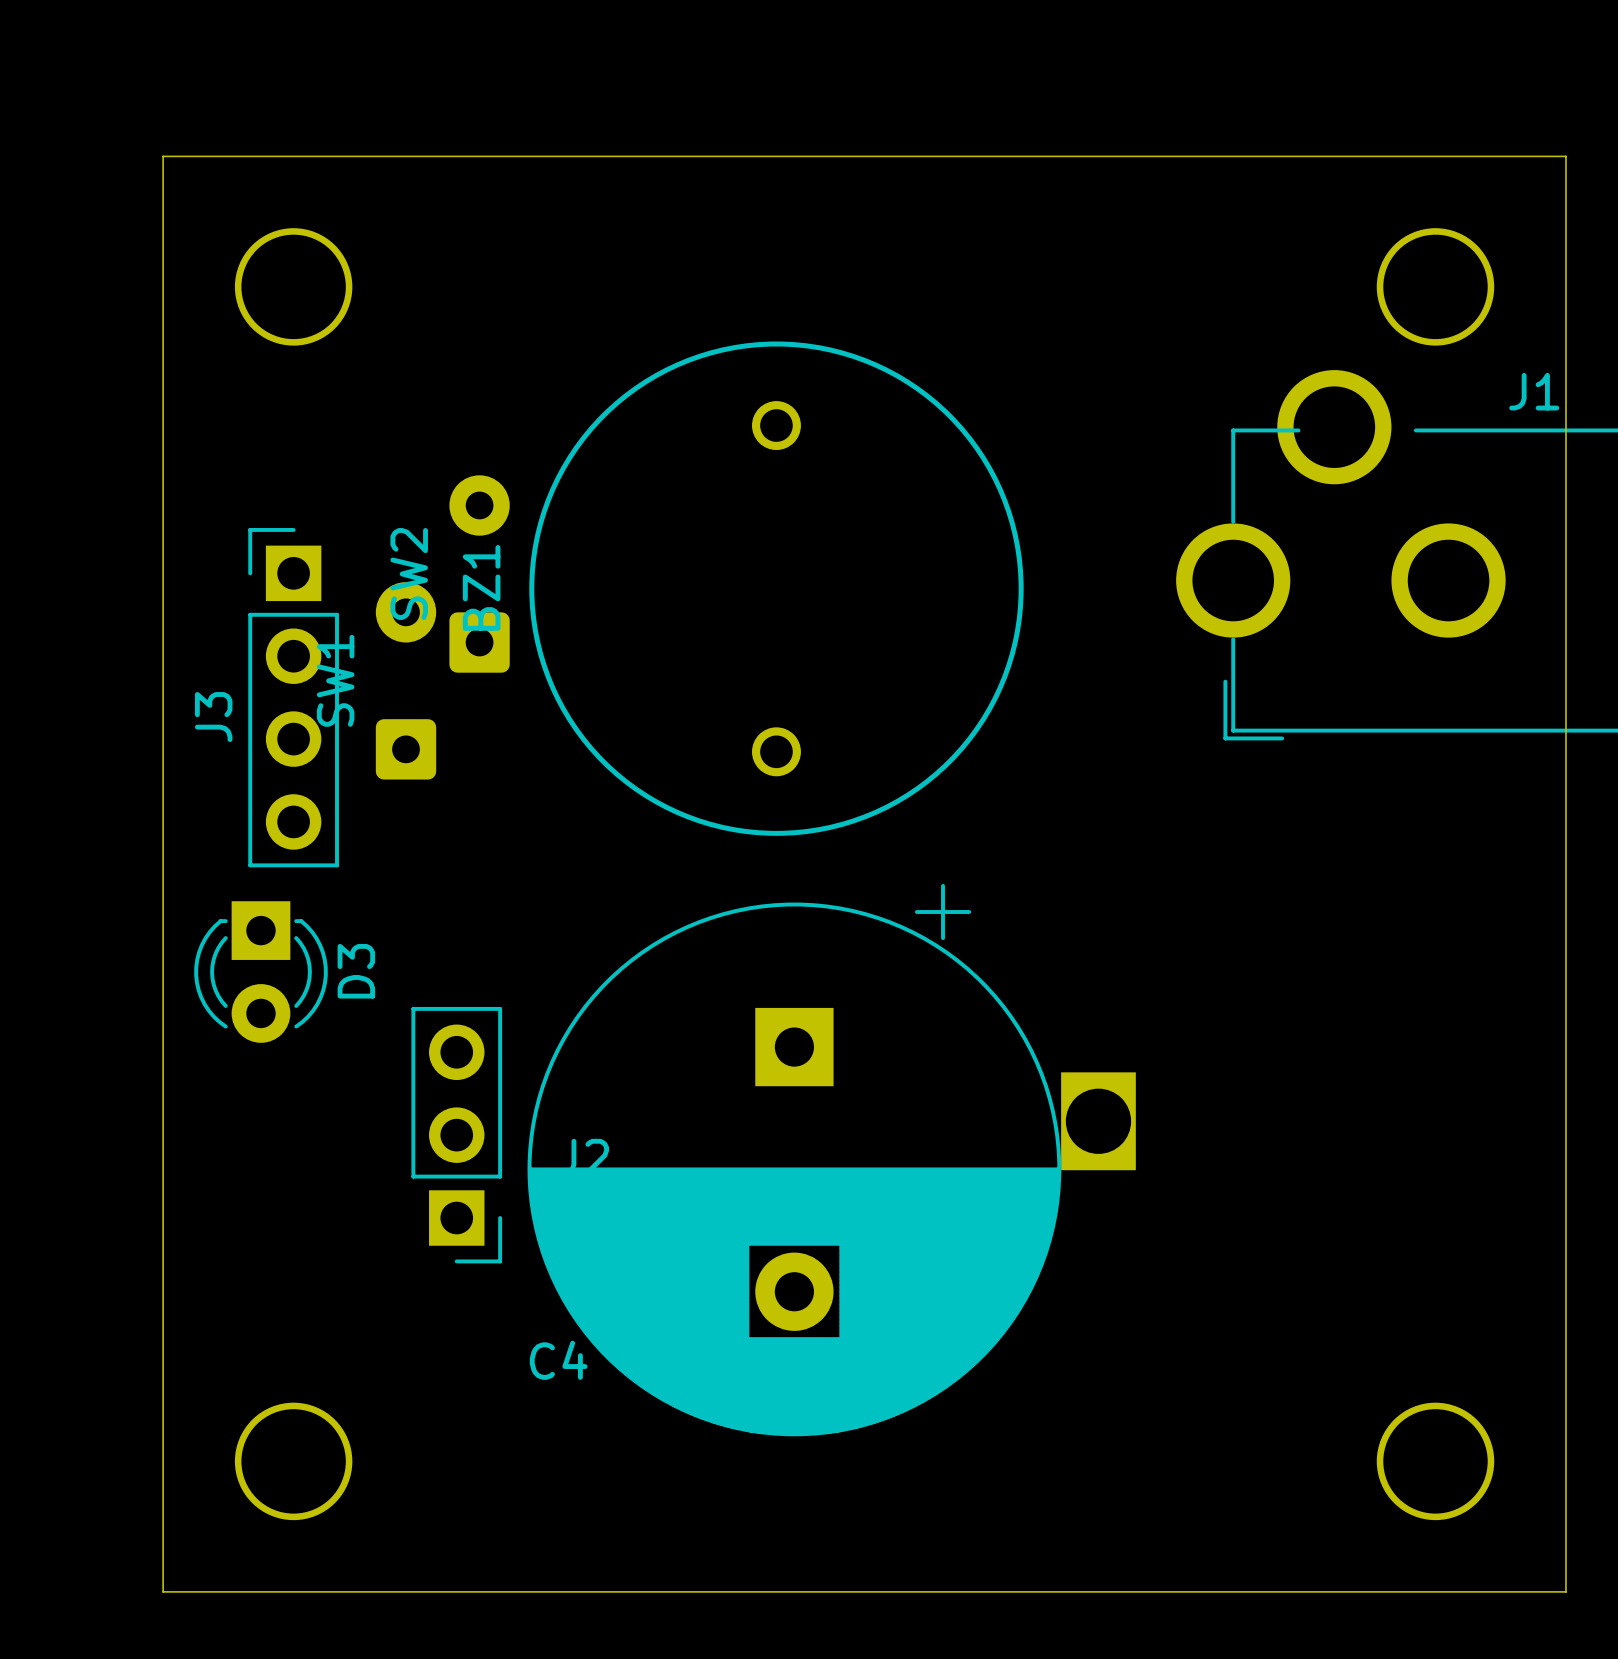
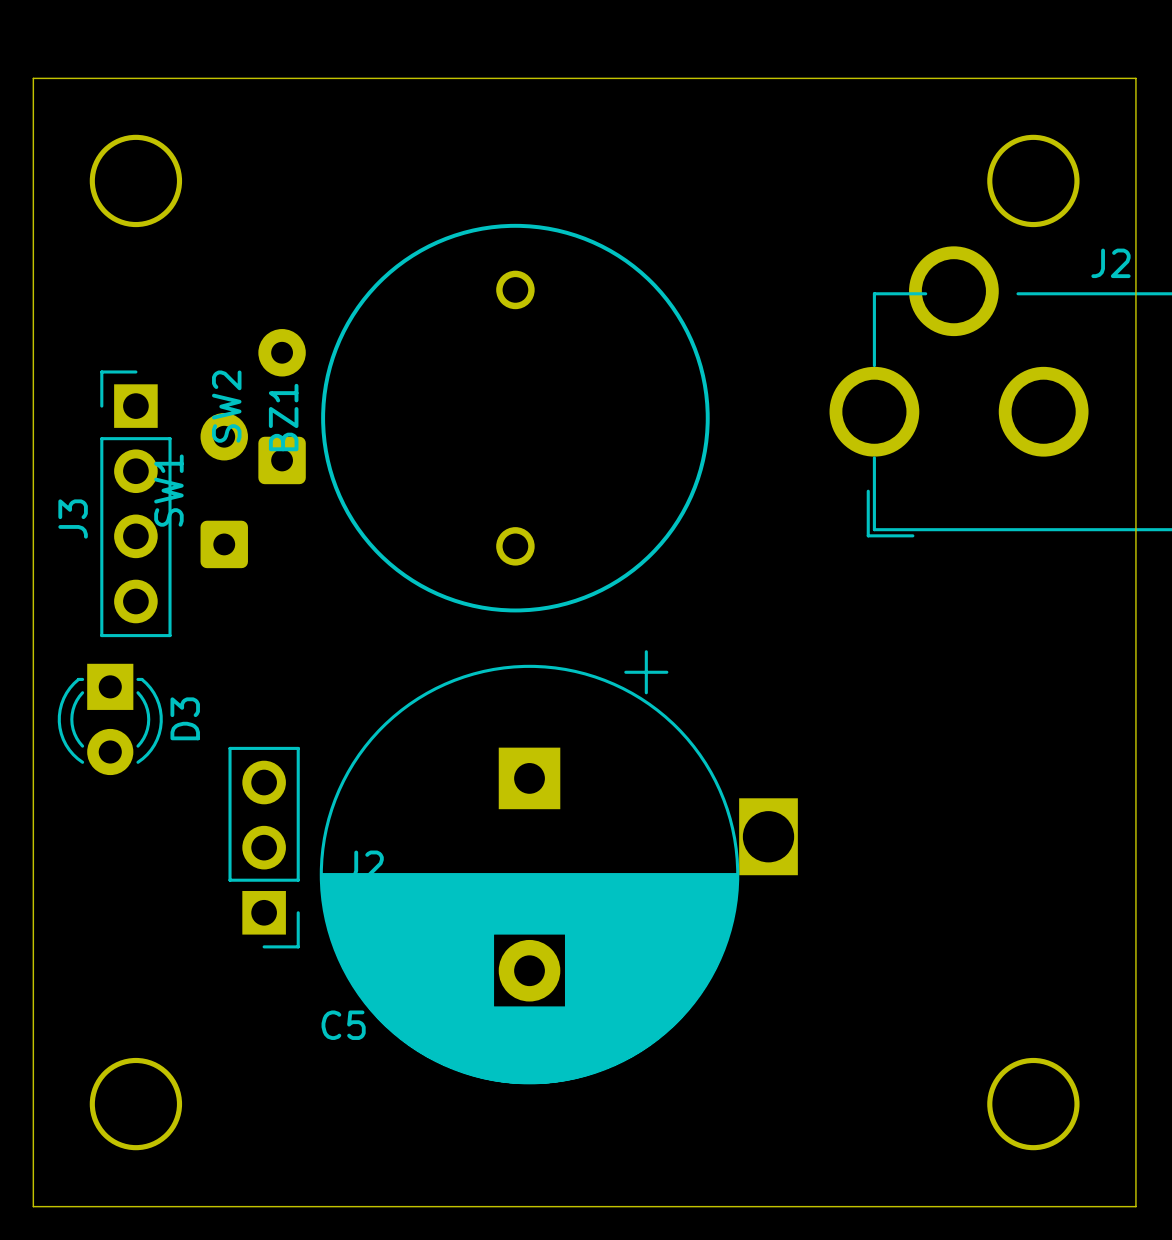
J1 name: J1 (1534, 391) -> J2 (1110, 263)
C4 name: C4 (558, 1360) -> C5 (343, 1025)

